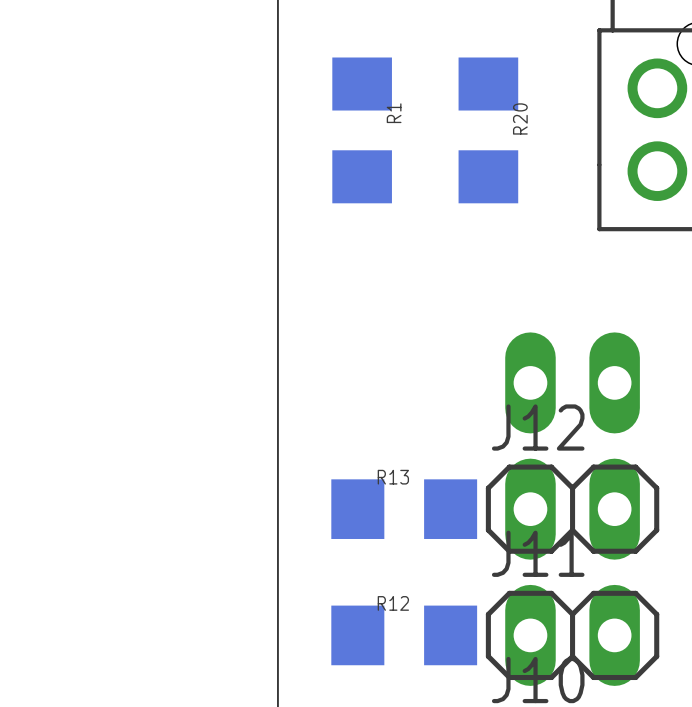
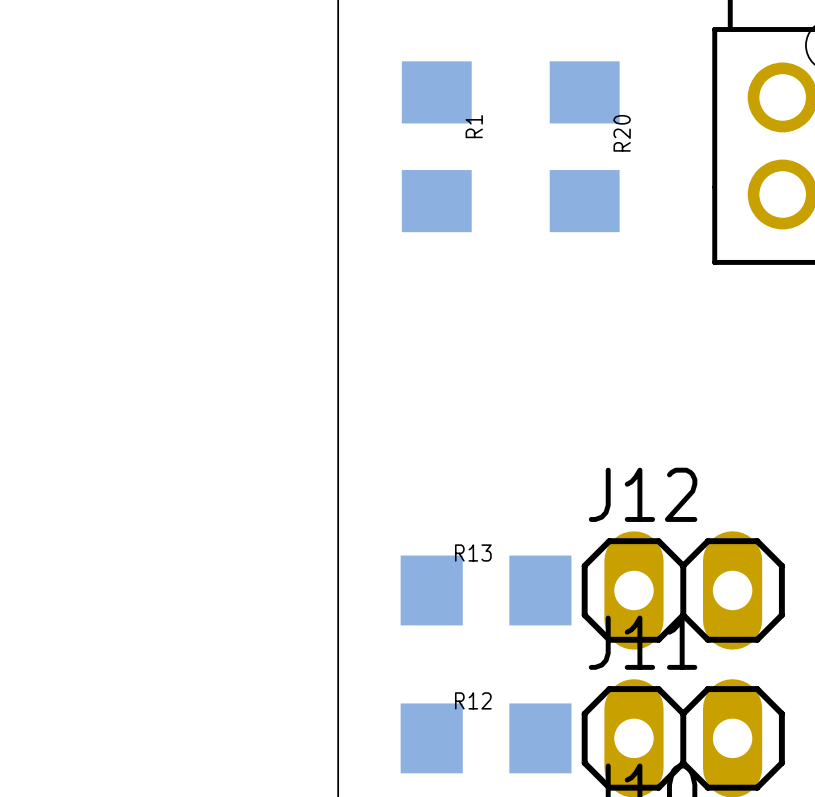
part: (572, 382) -> none

